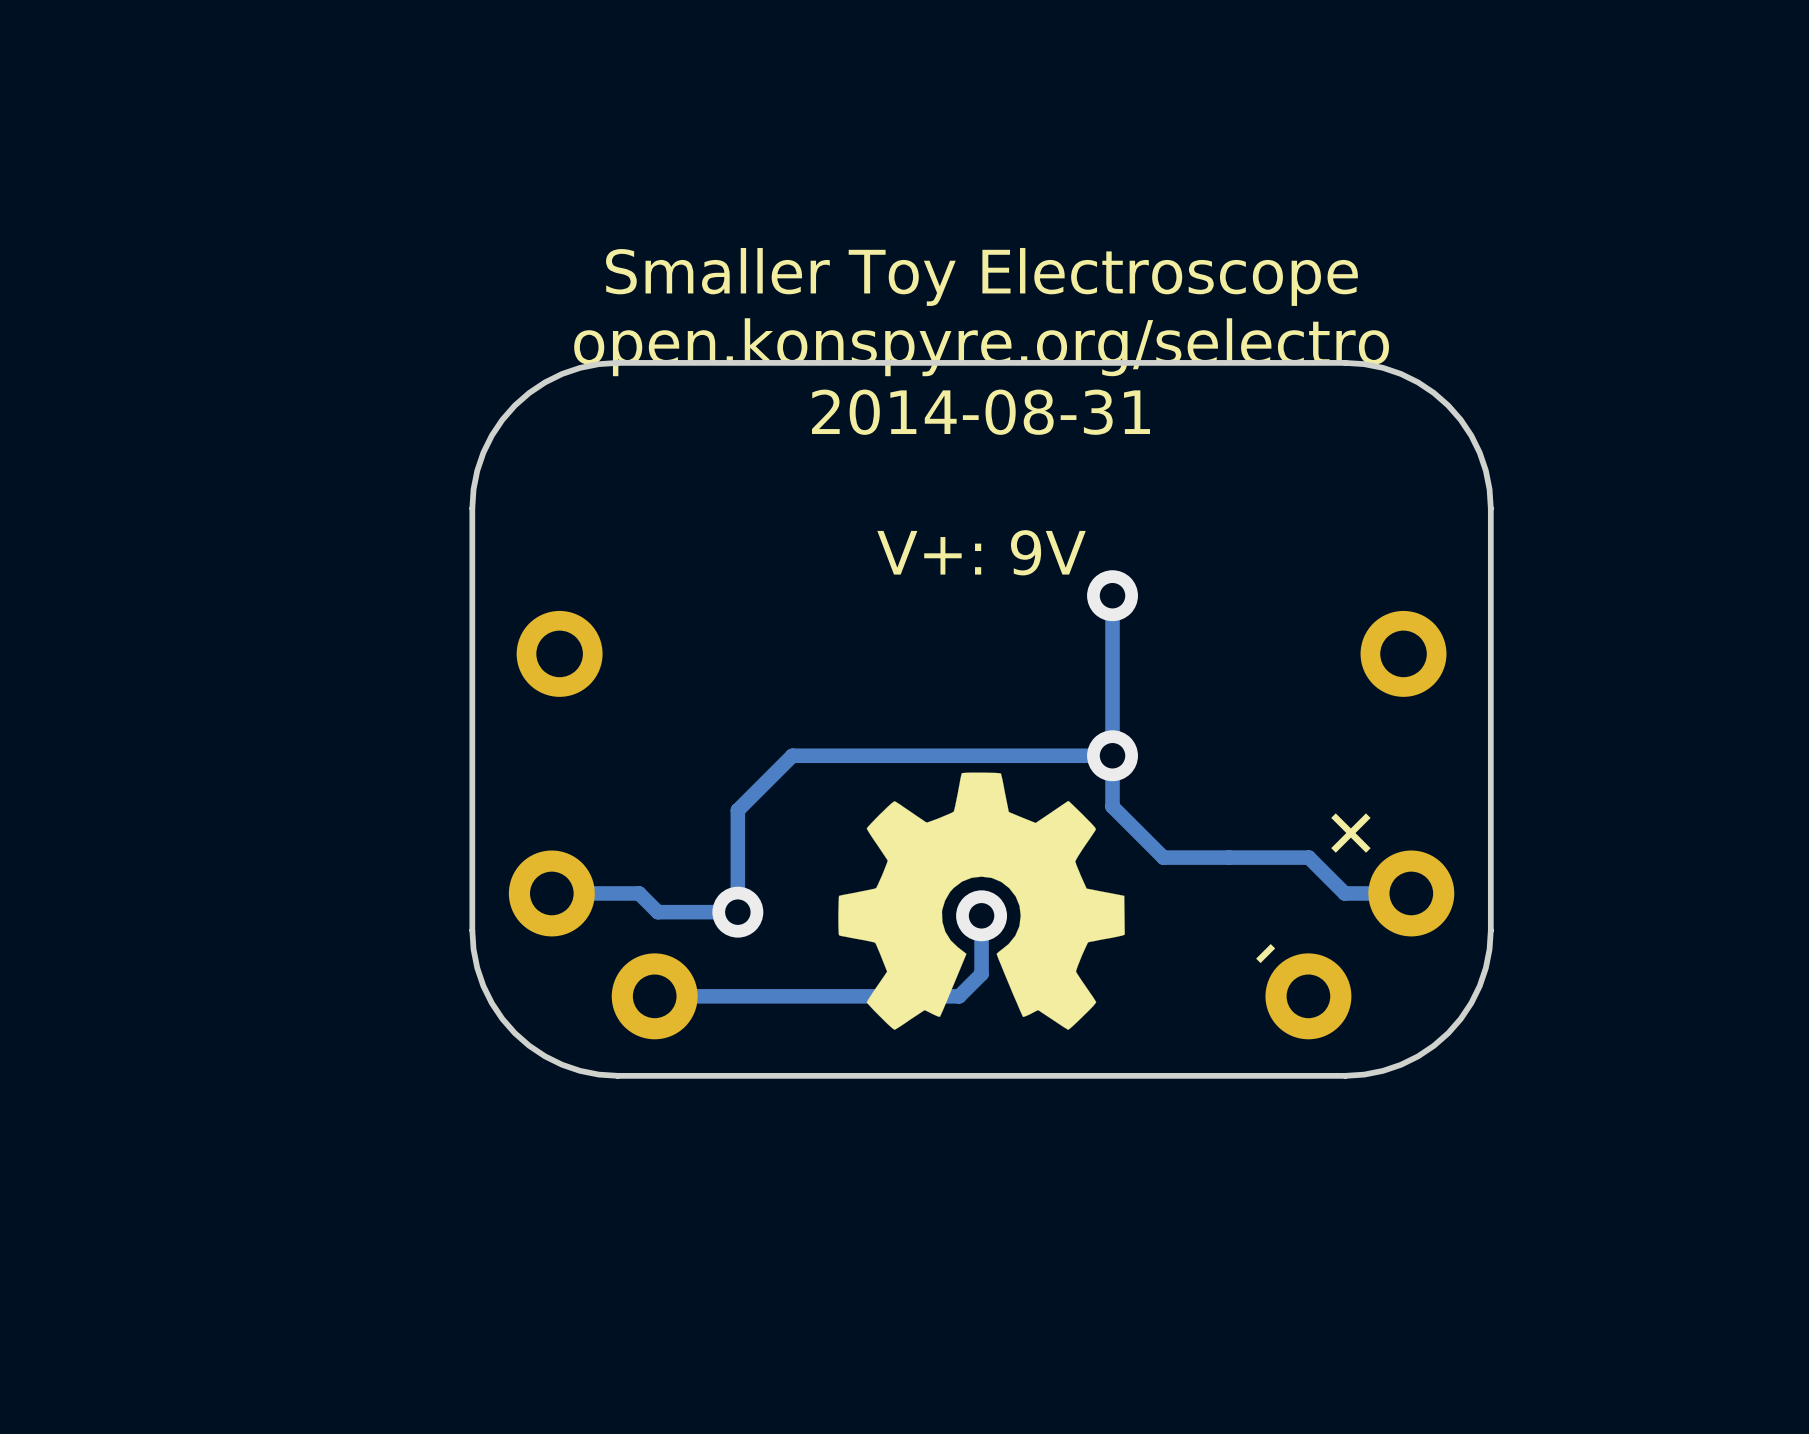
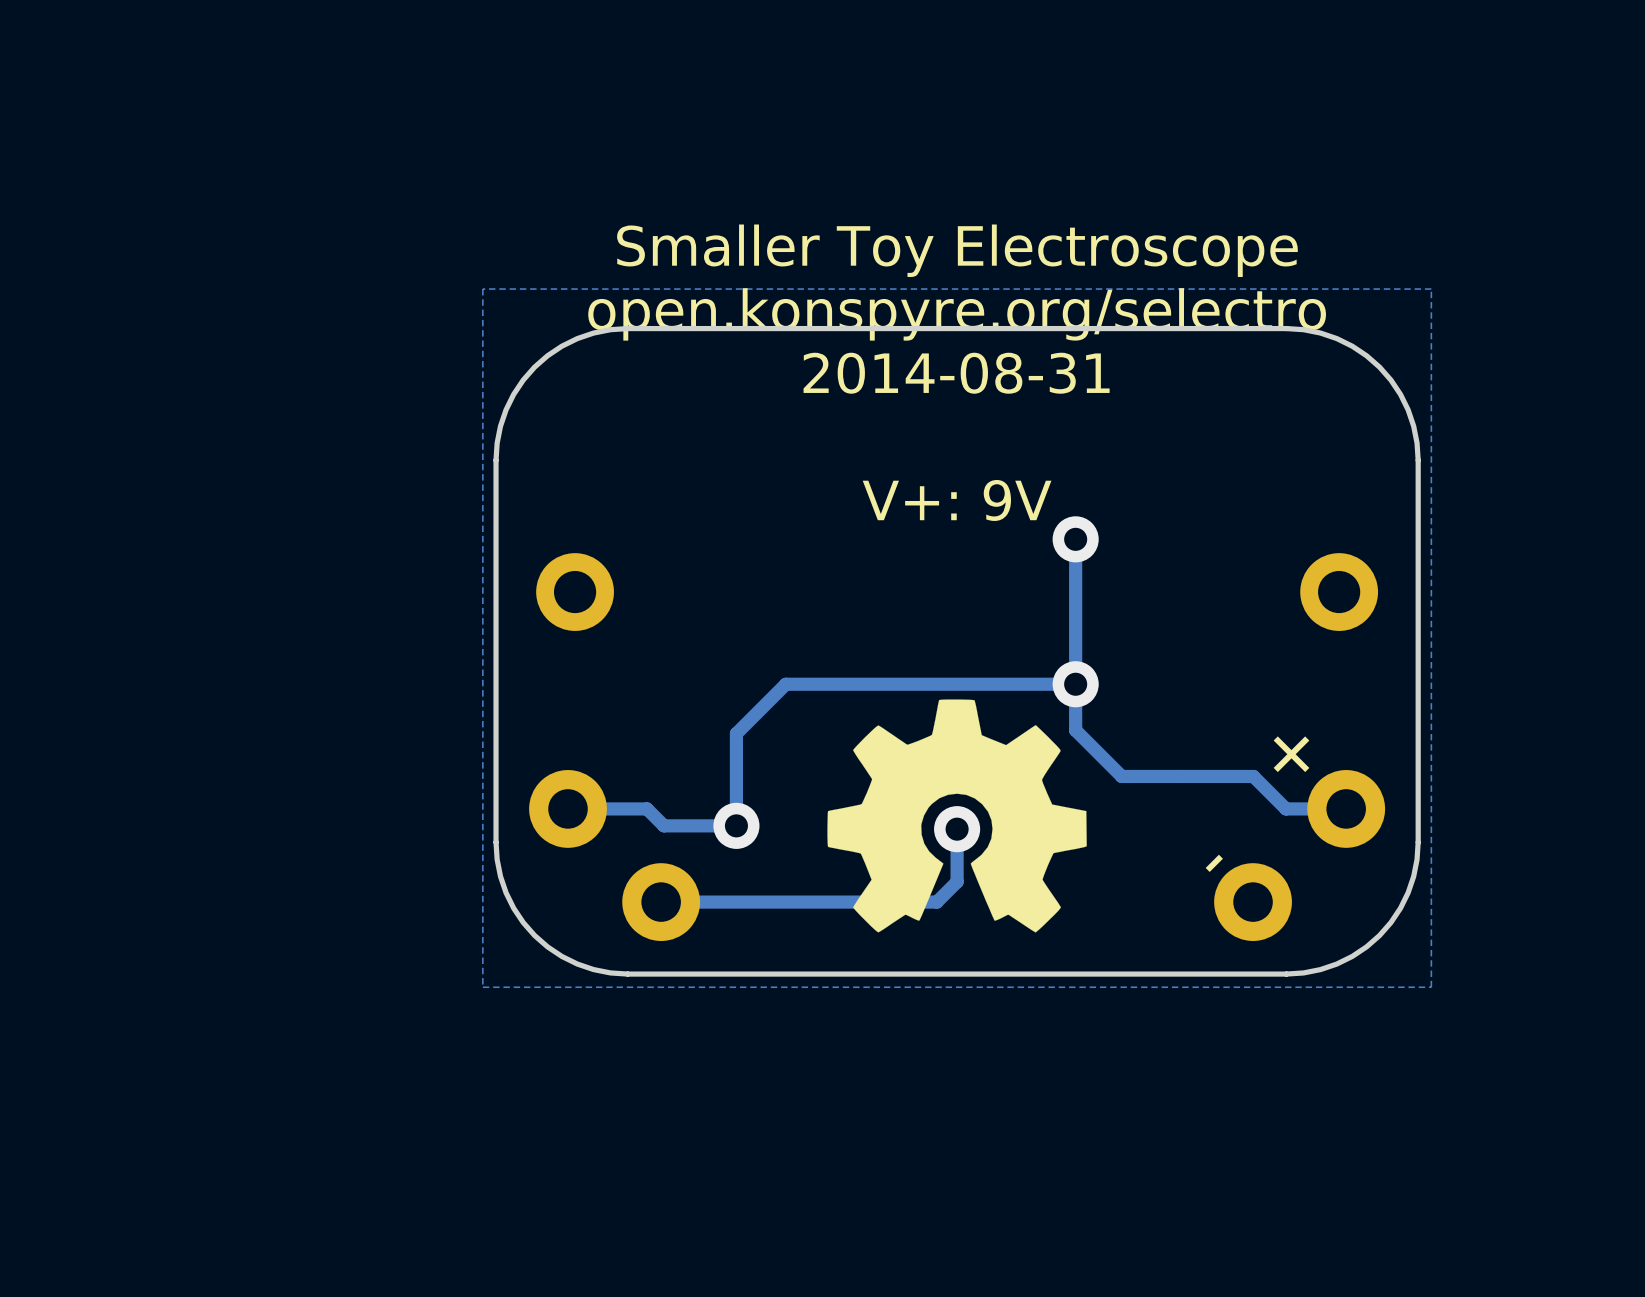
zone outline: none -> (1431, 289) (1431, 987) (482, 987) (482, 289) (1431, 289)

